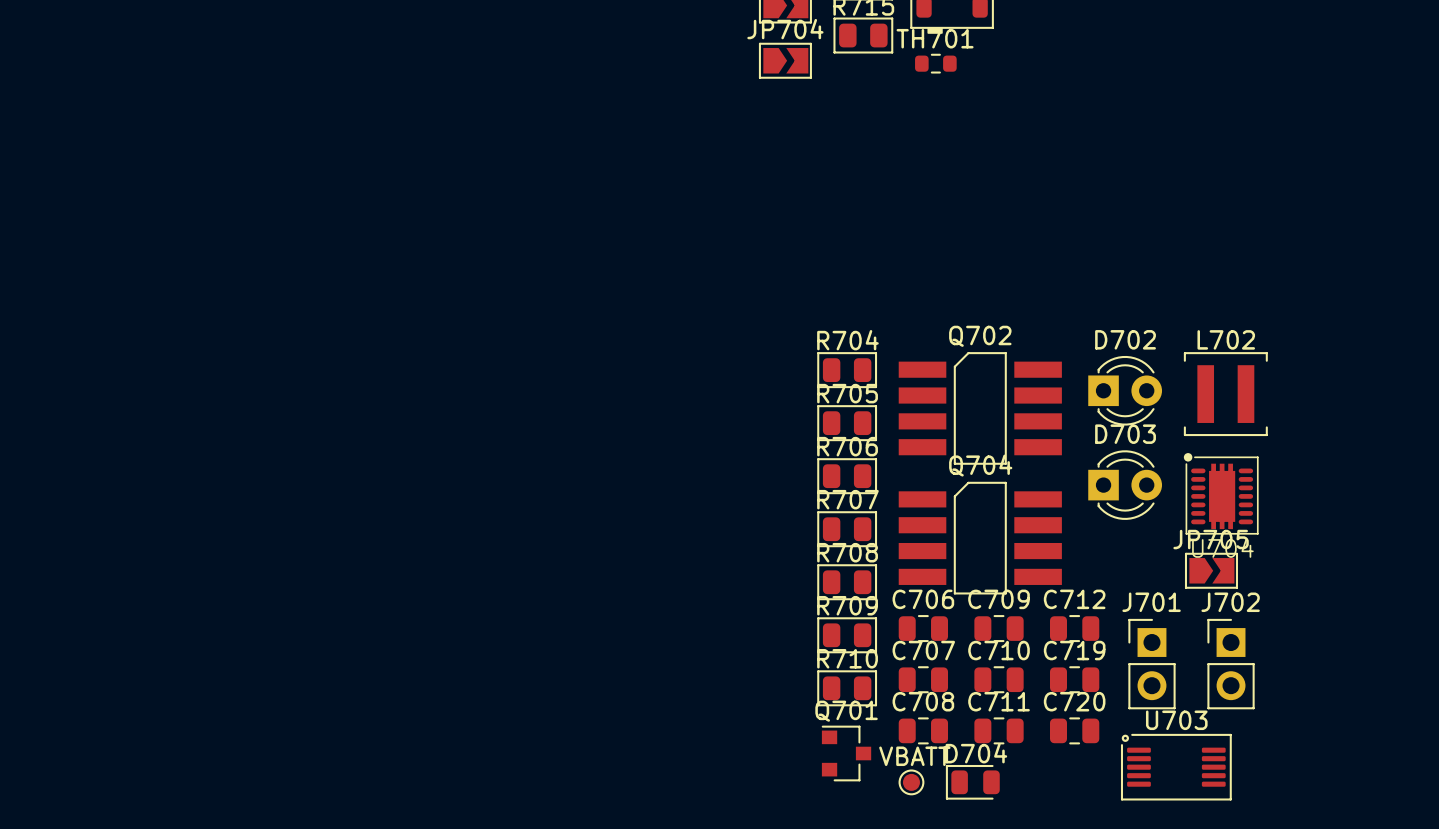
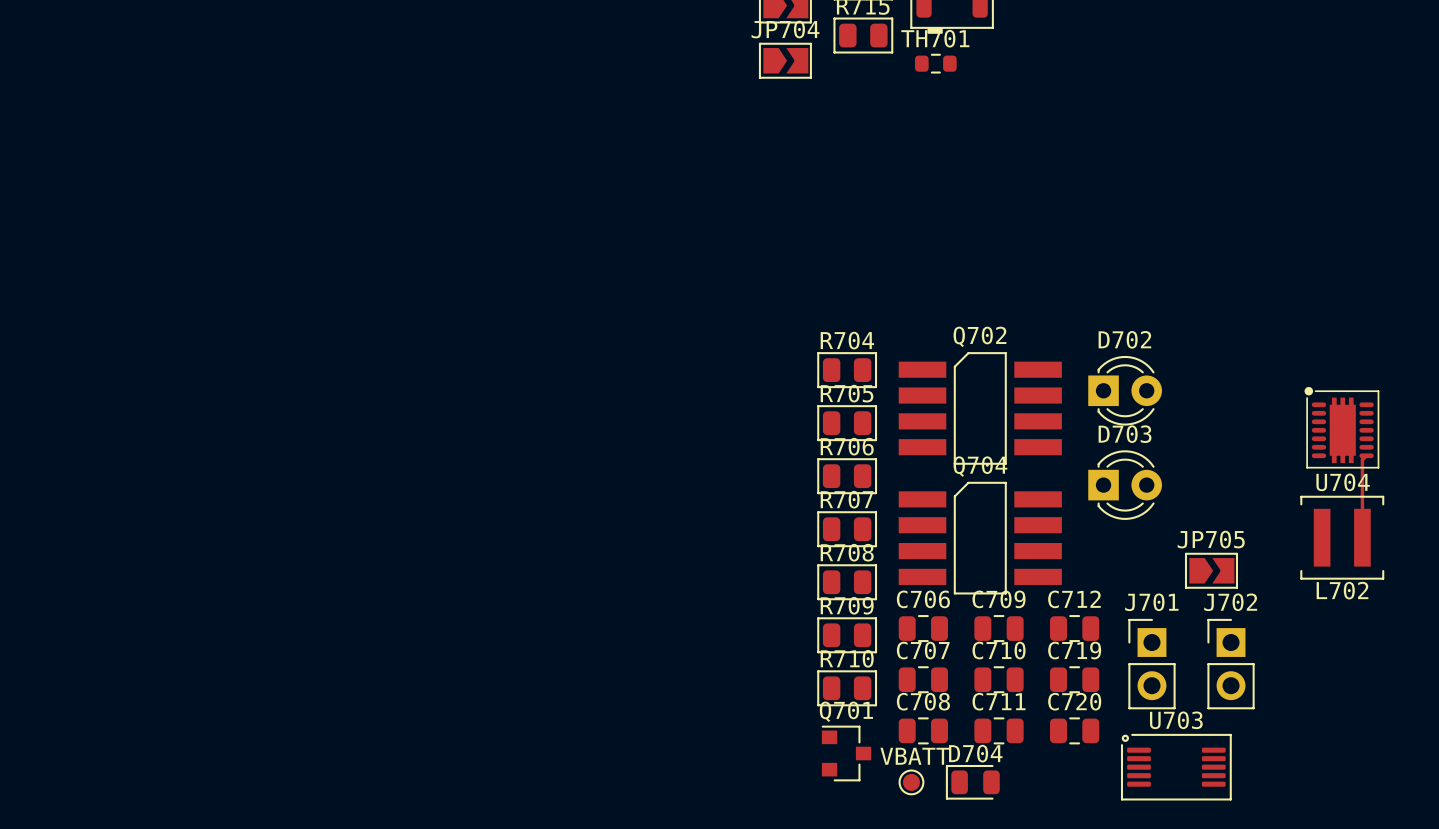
L702 name position: L702 (1226, 339) -> L702 (1342, 590)
L702 position: (1225, 394) -> (1342, 537)
top track: none -> (1366, 455) (1362, 459) (1362, 537)
U704 position: (1221, 493) -> (1341, 427)

